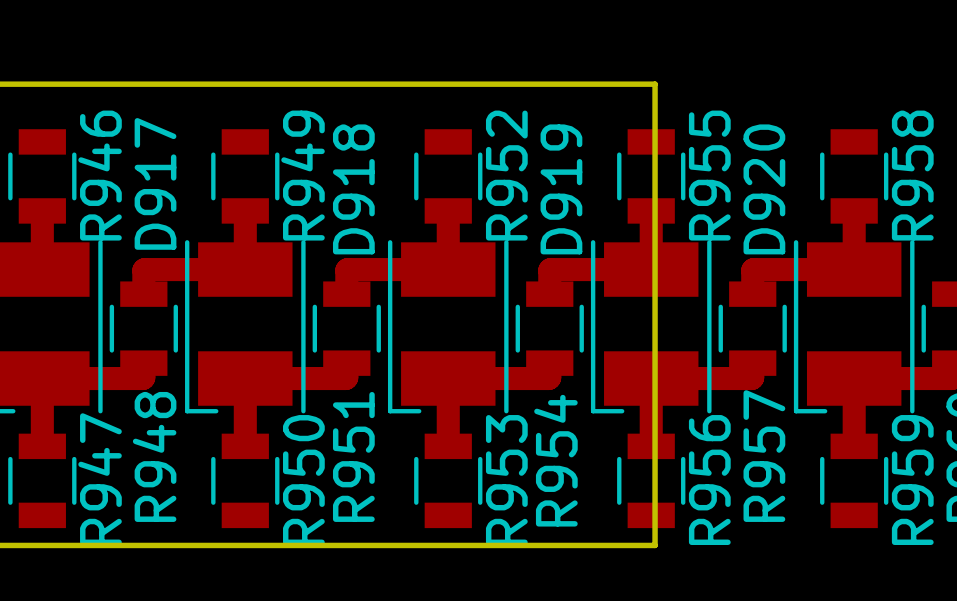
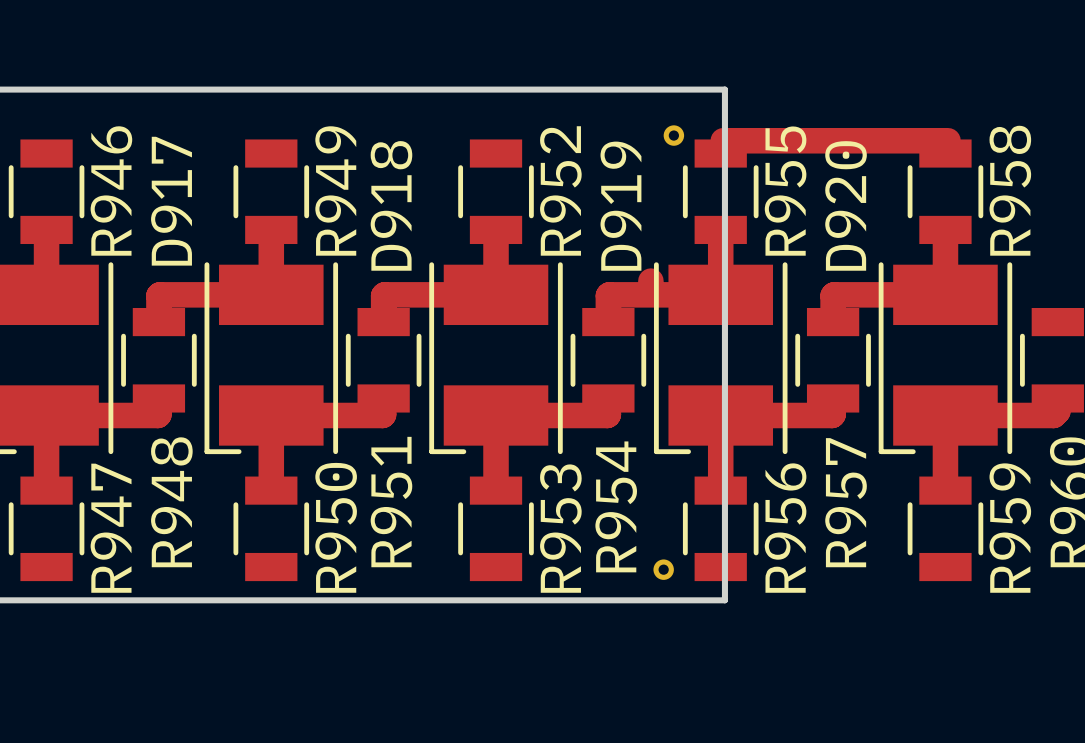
part: none -> (673, 135)
track: none -> (723, 140) (948, 140)
track: none -> (650, 281) (650, 282)
part: none -> (663, 569)

